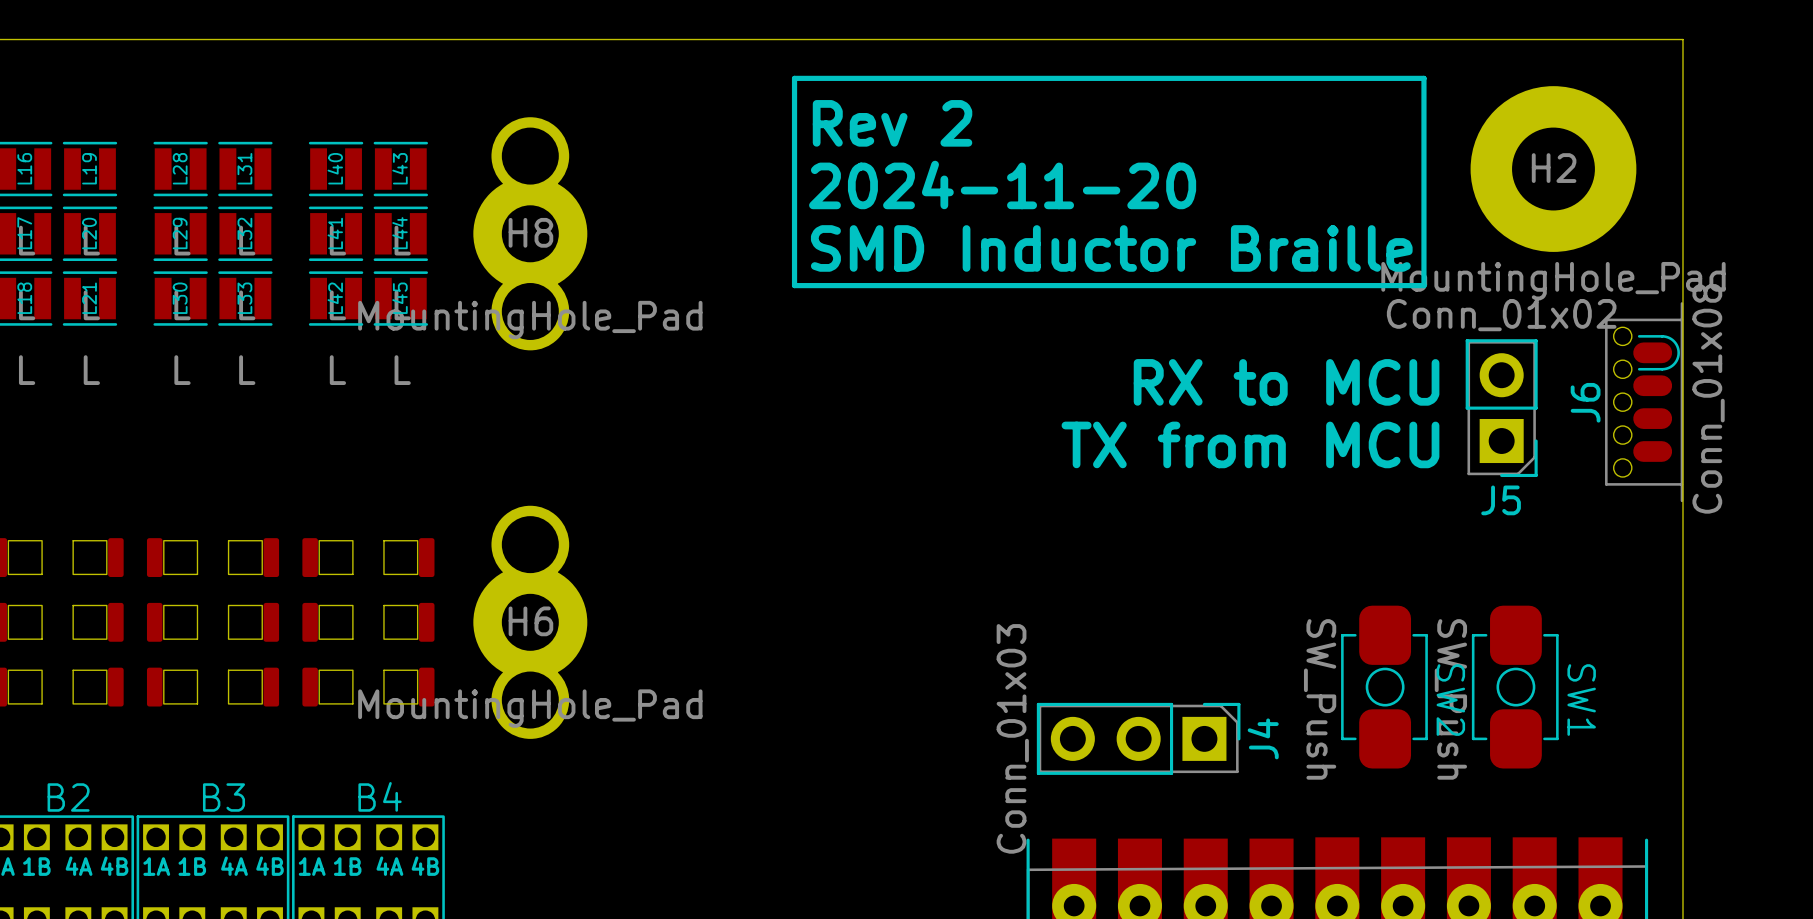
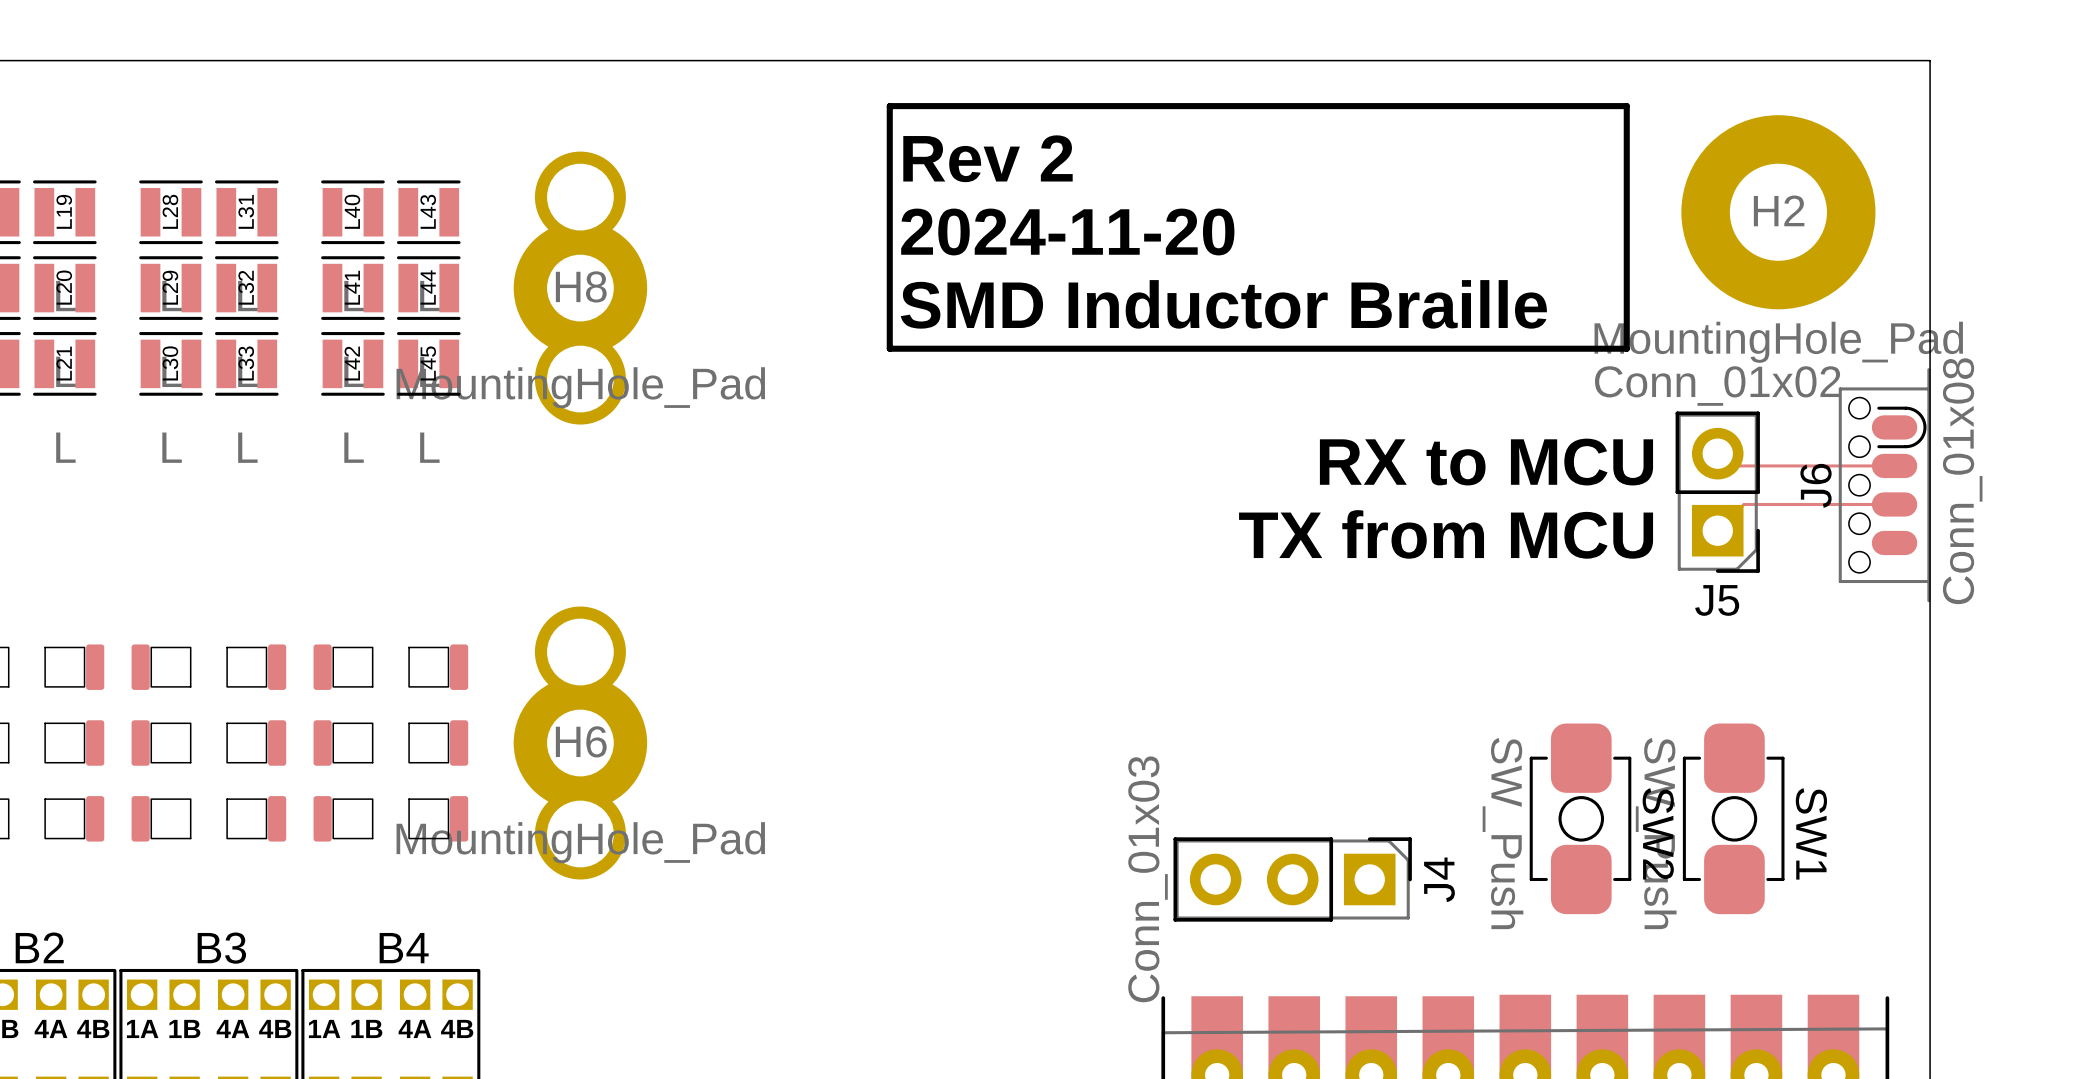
track: none -> (1717, 453) (1730, 465) (1894, 465)
track: none -> (1894, 504) (1743, 504) (1717, 530)

